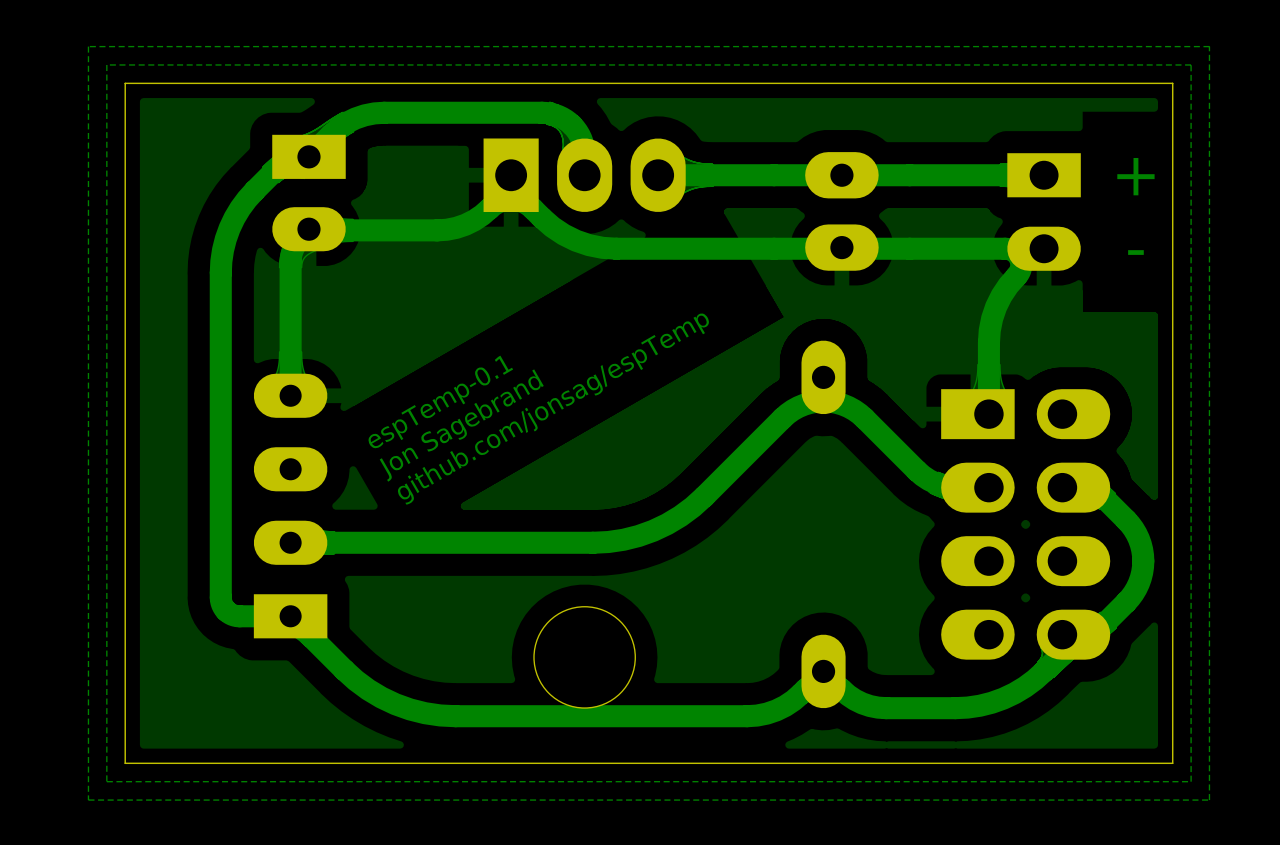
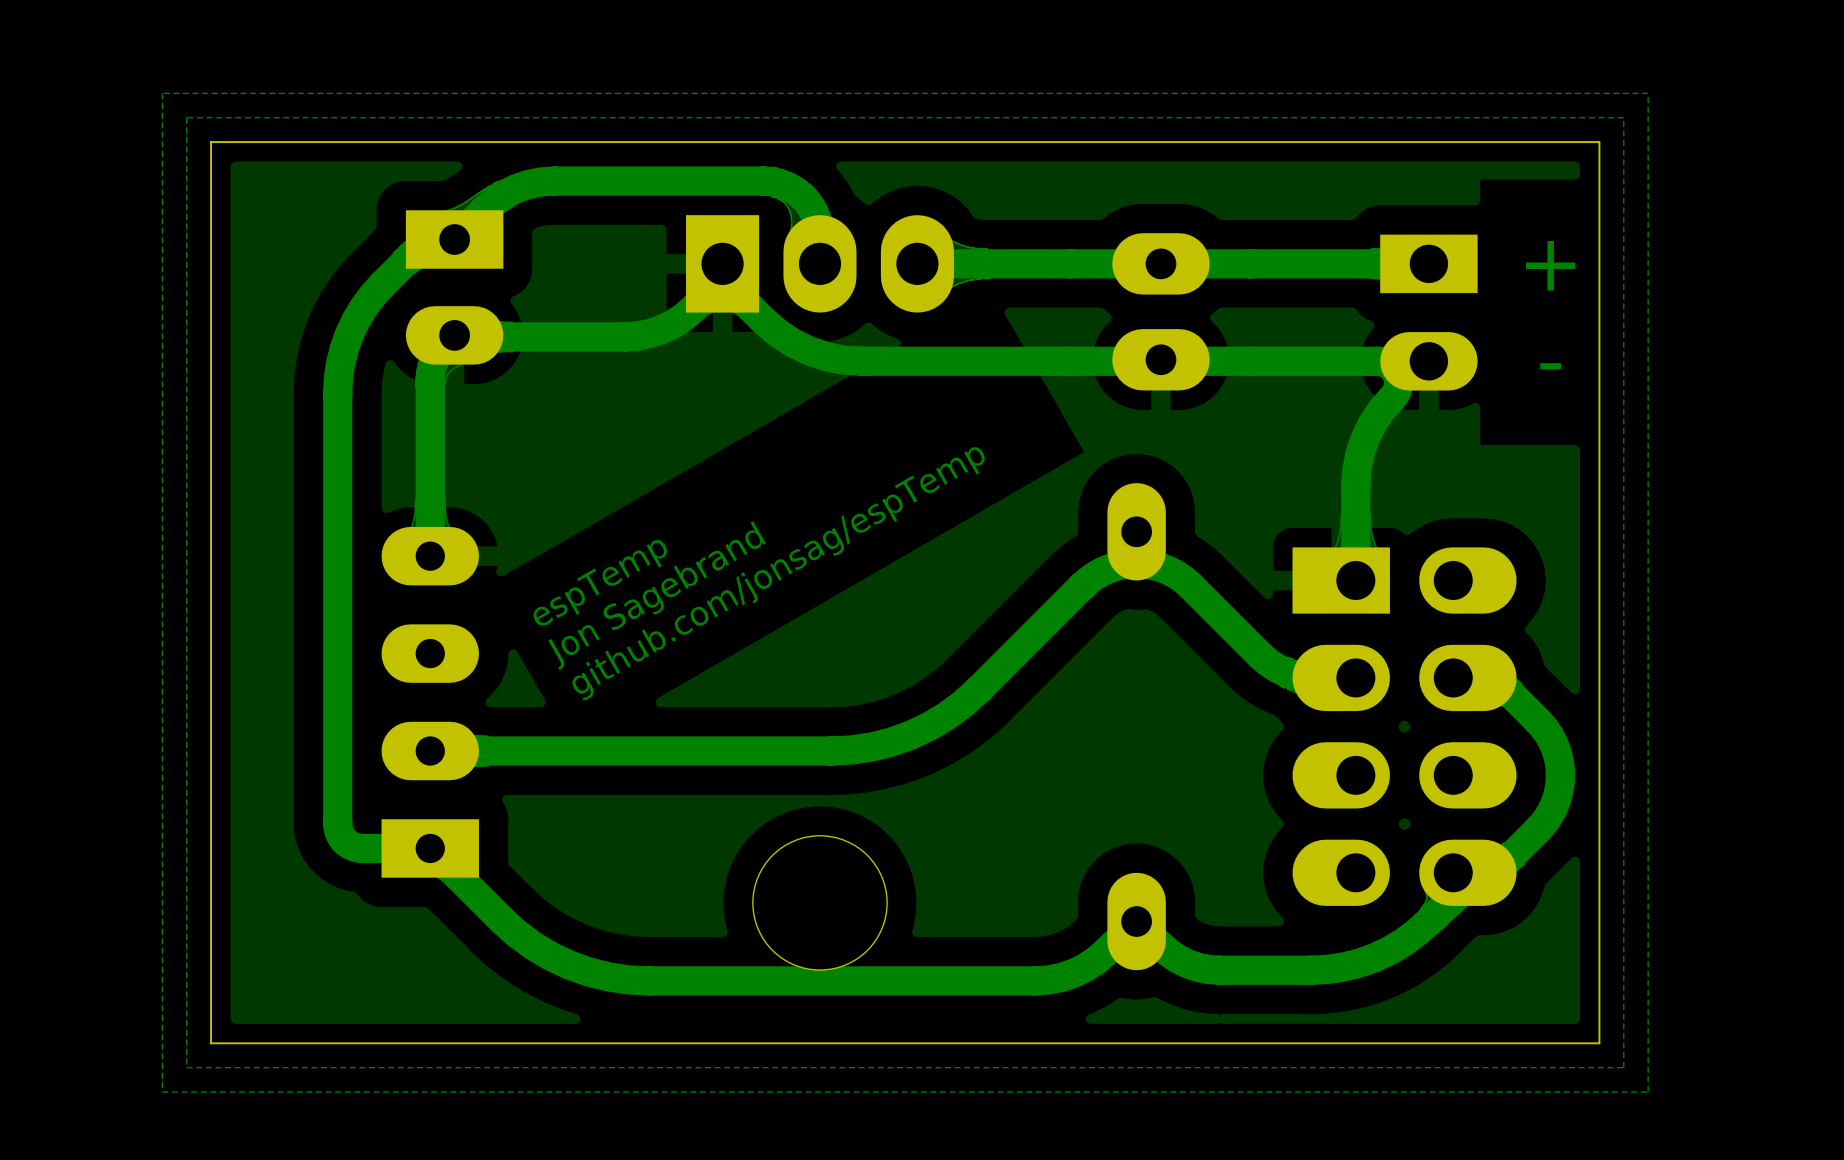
text: espTemp-0.1 (440, 402) -> espTemp (600, 582)

